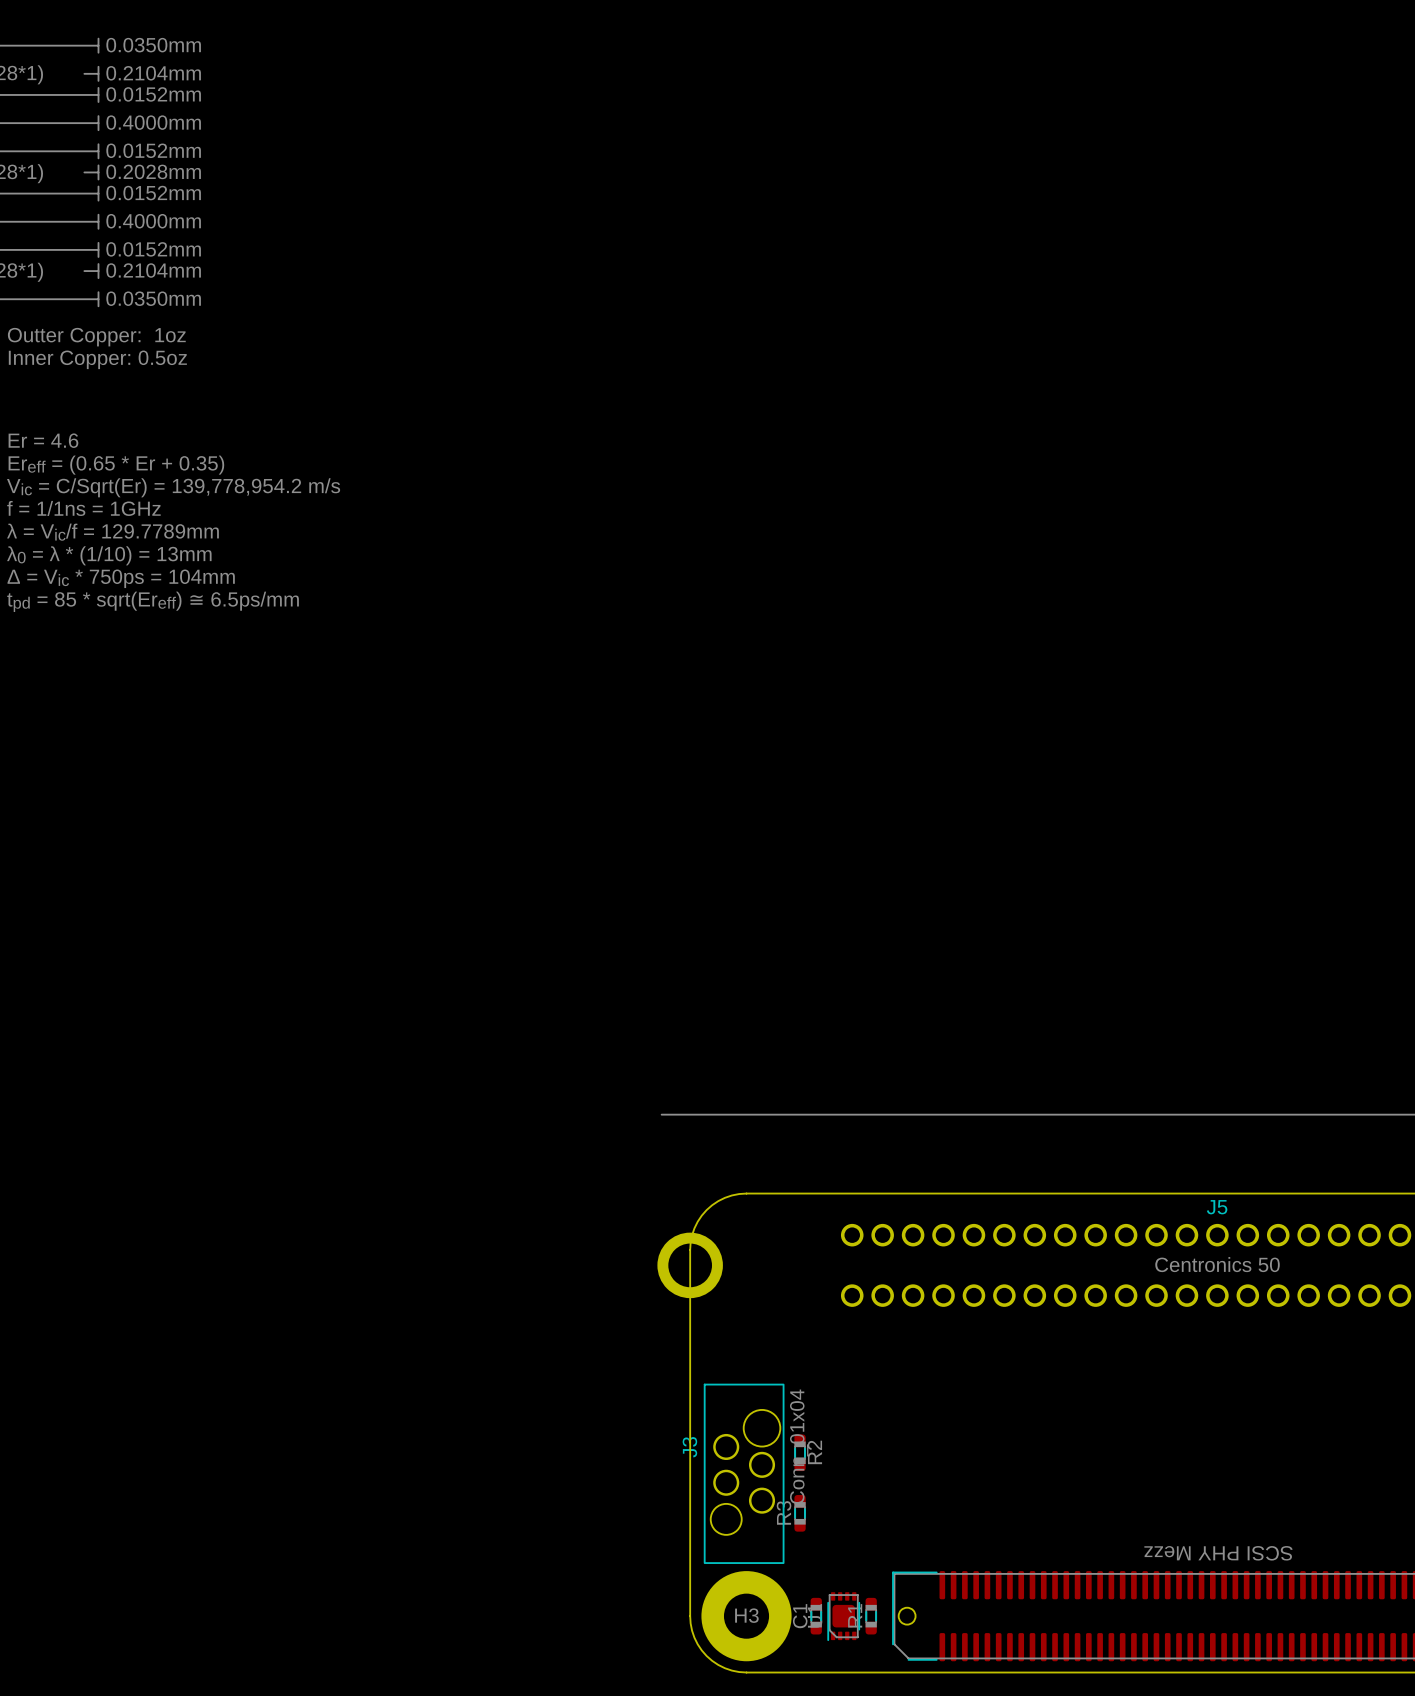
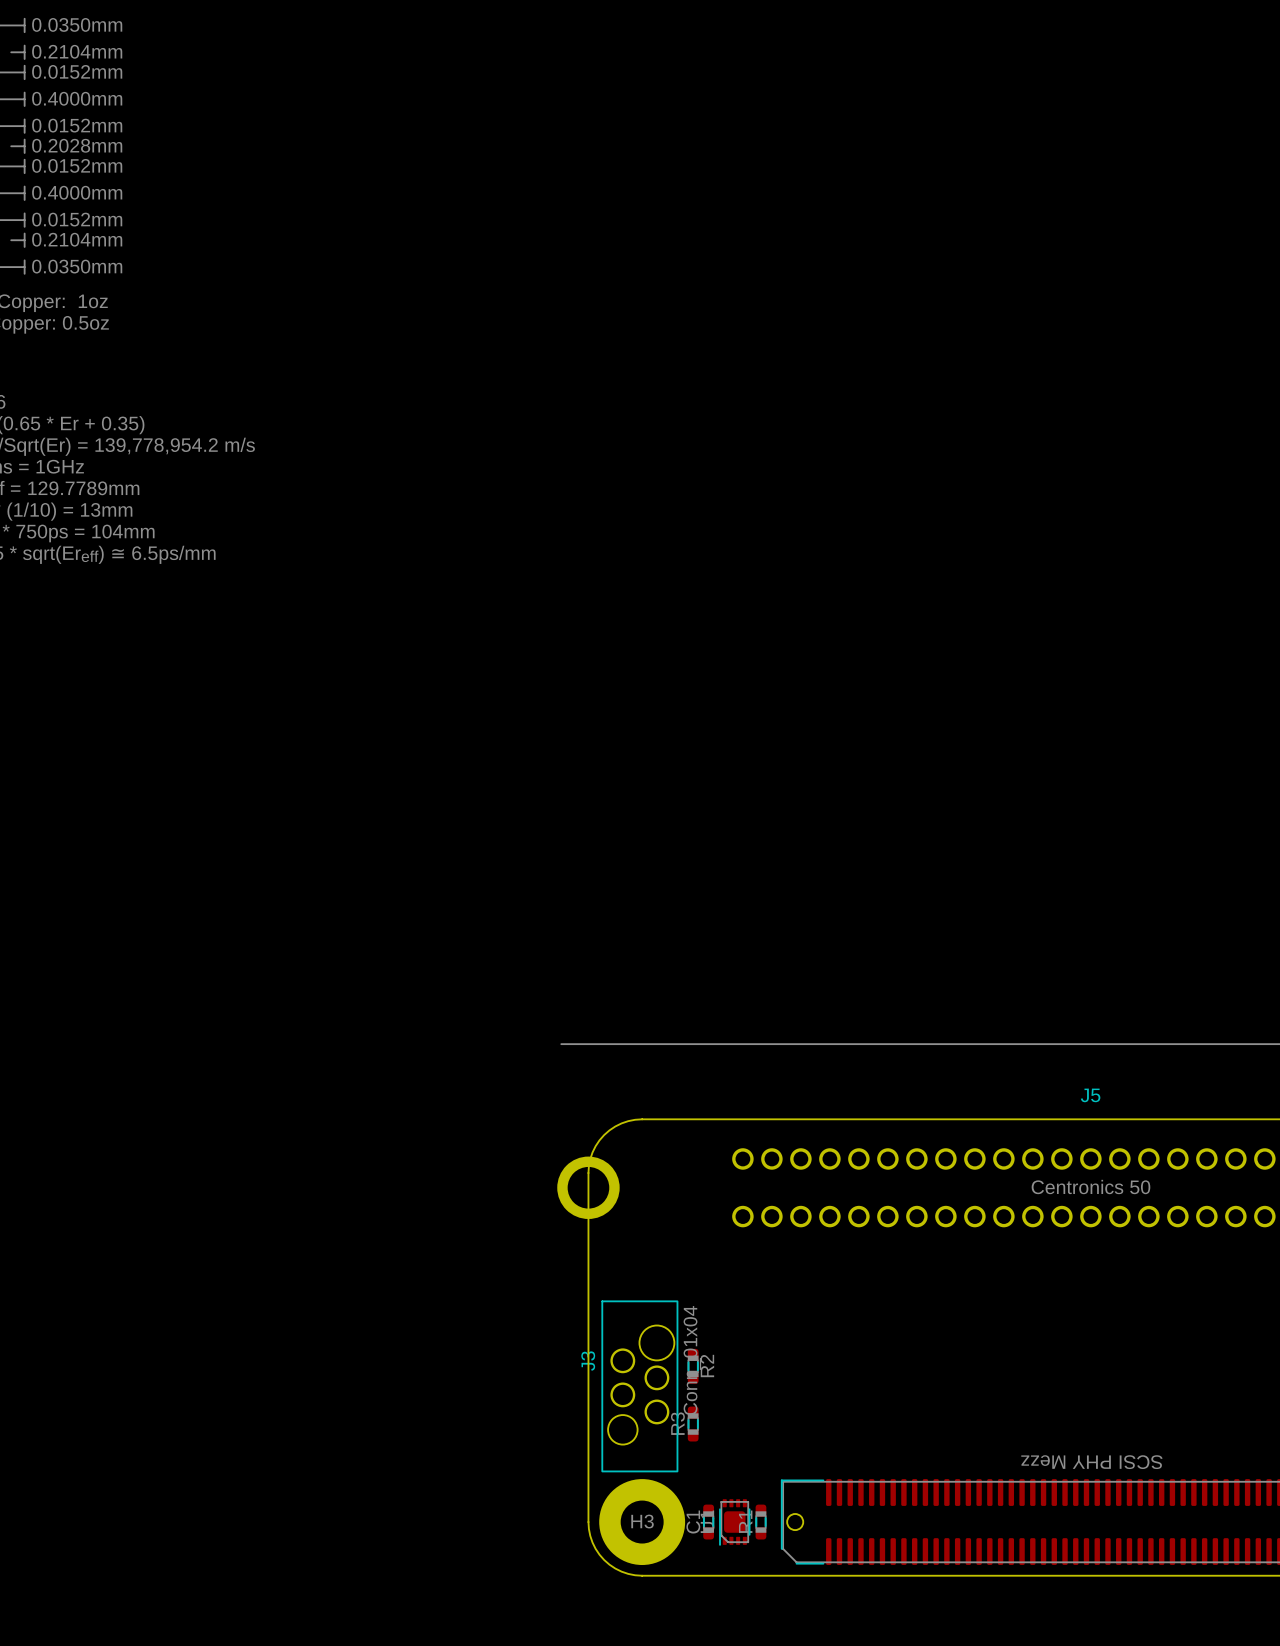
J5 name position: J5 (1217, 1207) -> J5 (1090, 1095)

